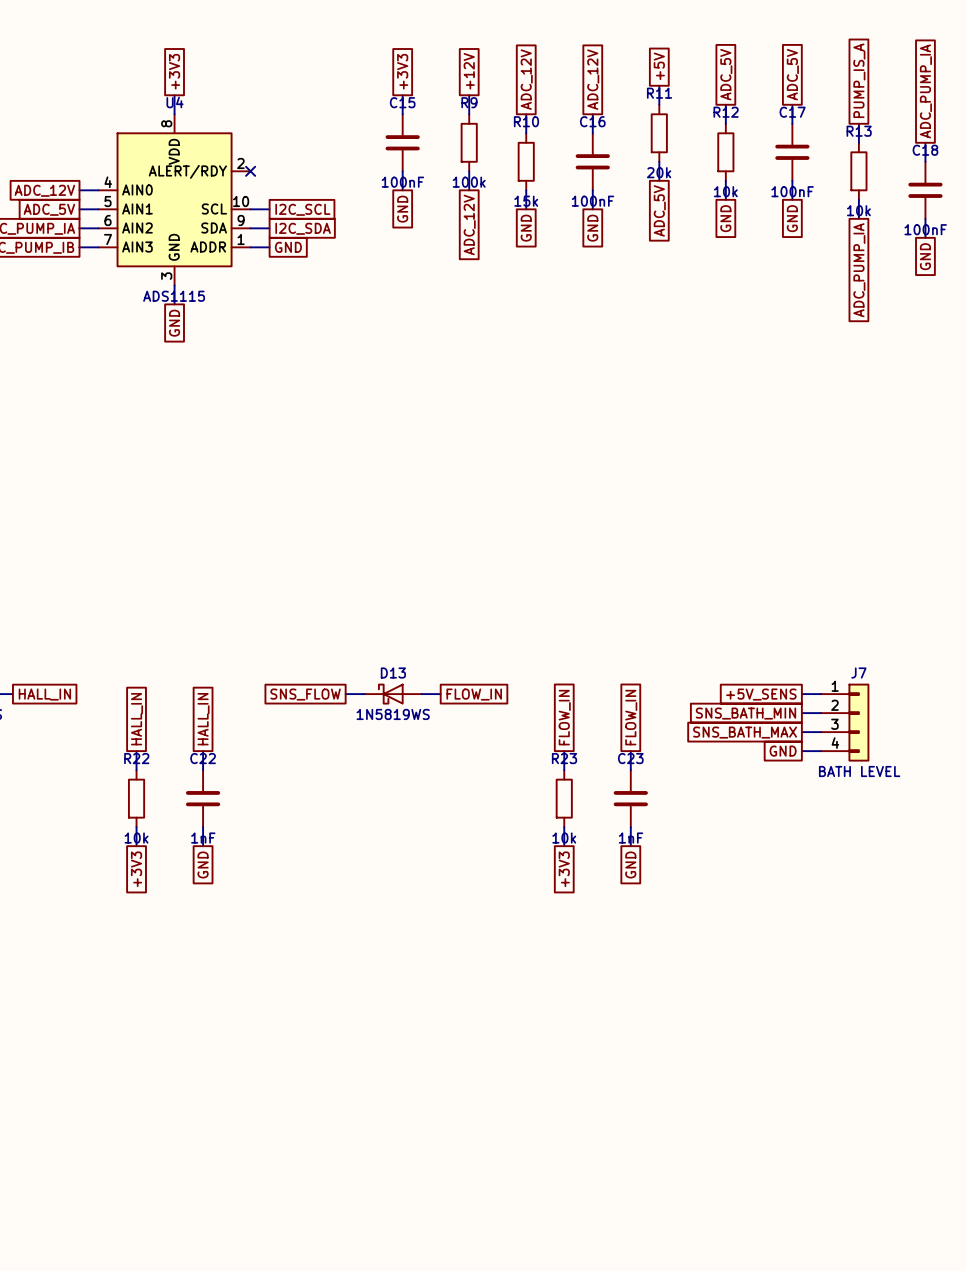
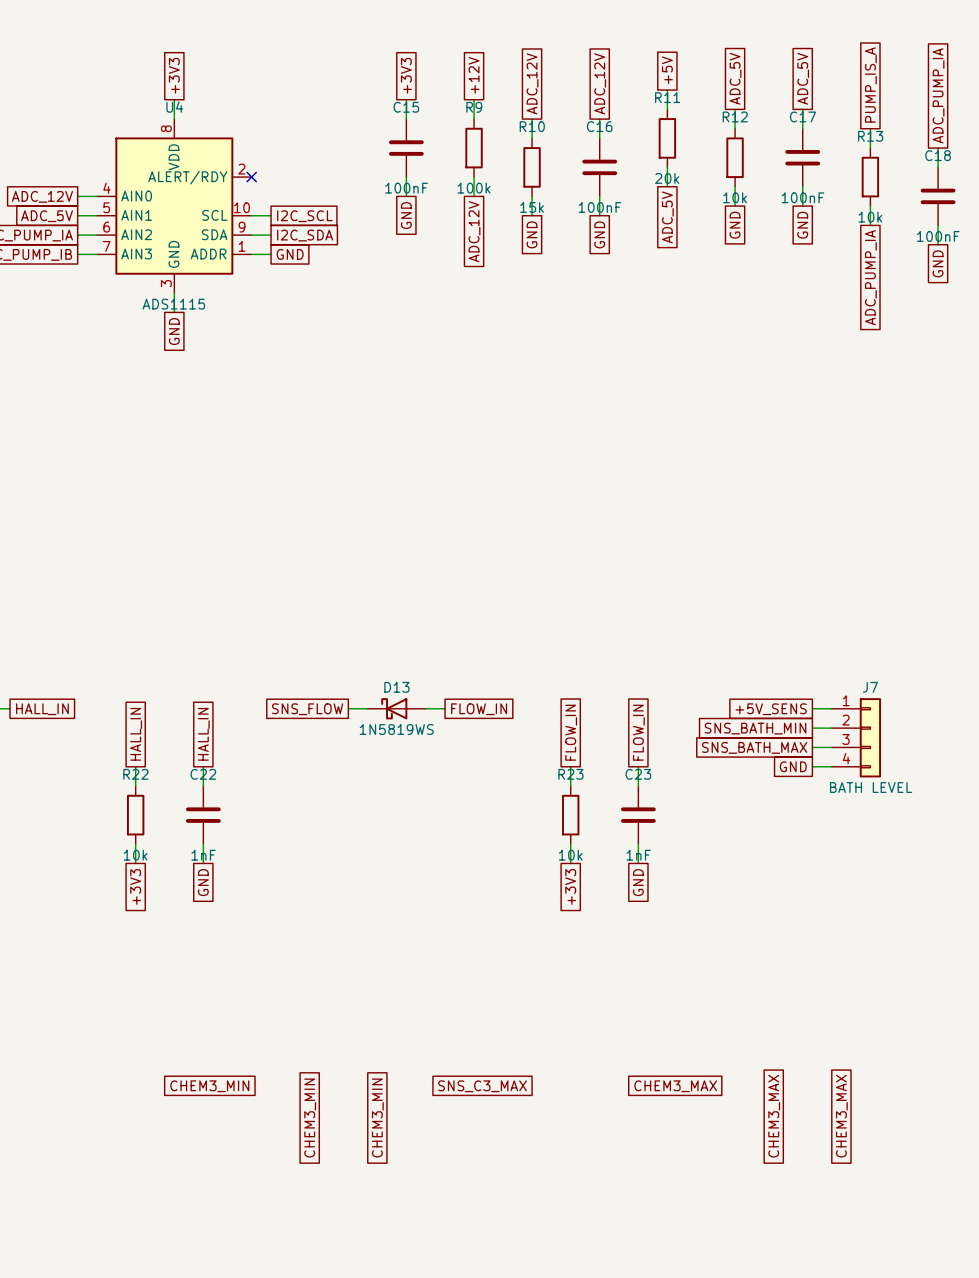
global label: none -> CHEM3_MIN (209, 1086)
global label: none -> SNS_C3_MAX (482, 1086)
global label: none -> CHEM3_MAX (675, 1086)
global label: none -> CHEM3_MAX (774, 1116)
global label: none -> CHEM3_MAX (841, 1116)
global label: none -> CHEM3_MIN (310, 1118)
global label: none -> CHEM3_MIN (377, 1118)

